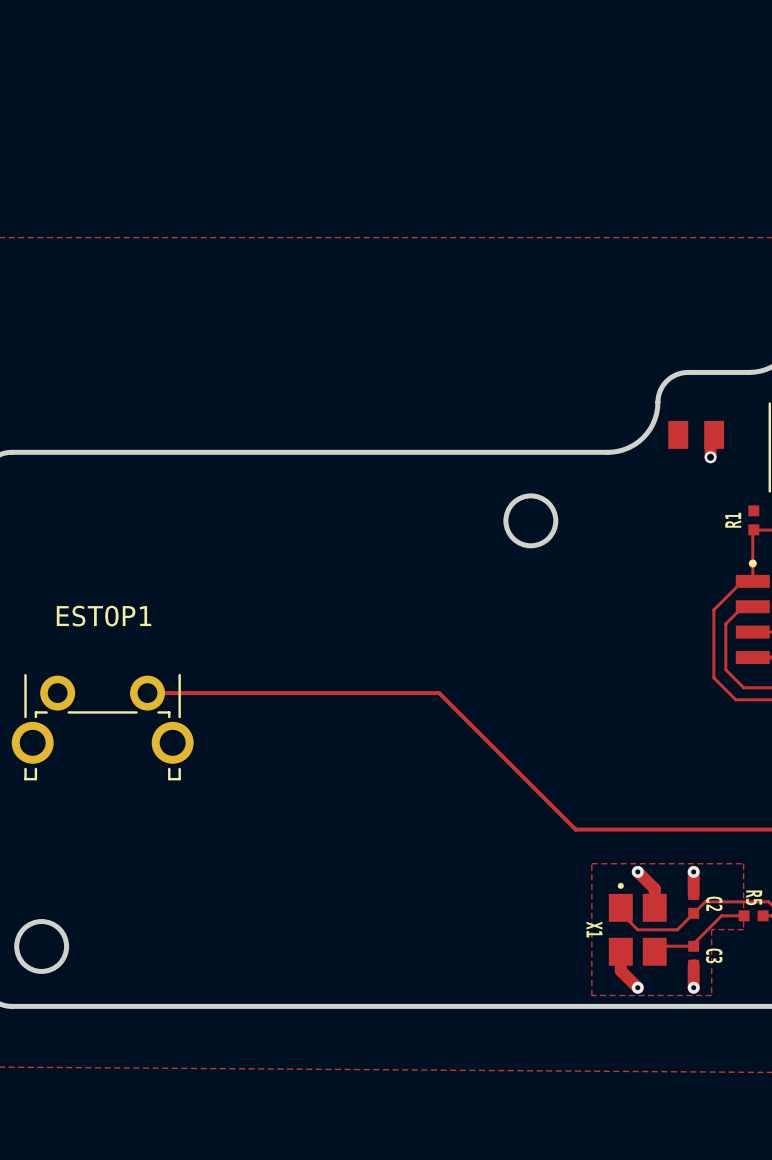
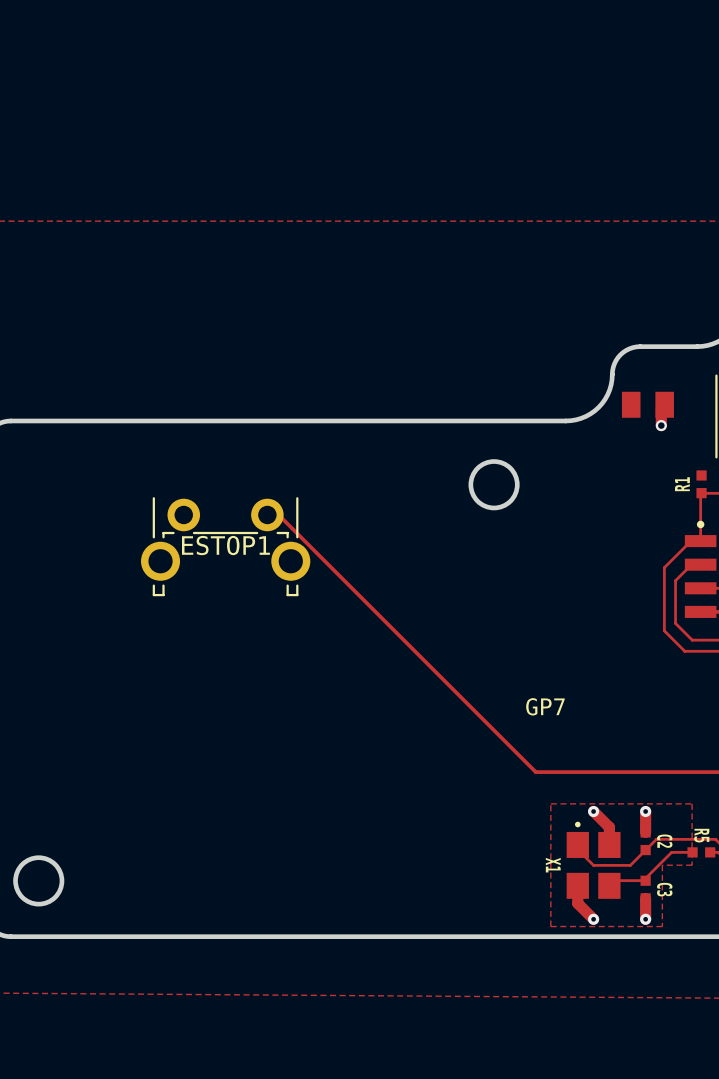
ESTOP1 name position: ESTOP1 (104, 616) -> ESTOP1 (225, 545)
track: (147, 693) (439, 693) -> (267, 514) (278, 514) (408, 645)
ESTOP1 position: (102, 727) -> (225, 546)
text: none -> GP7 (545, 706)

